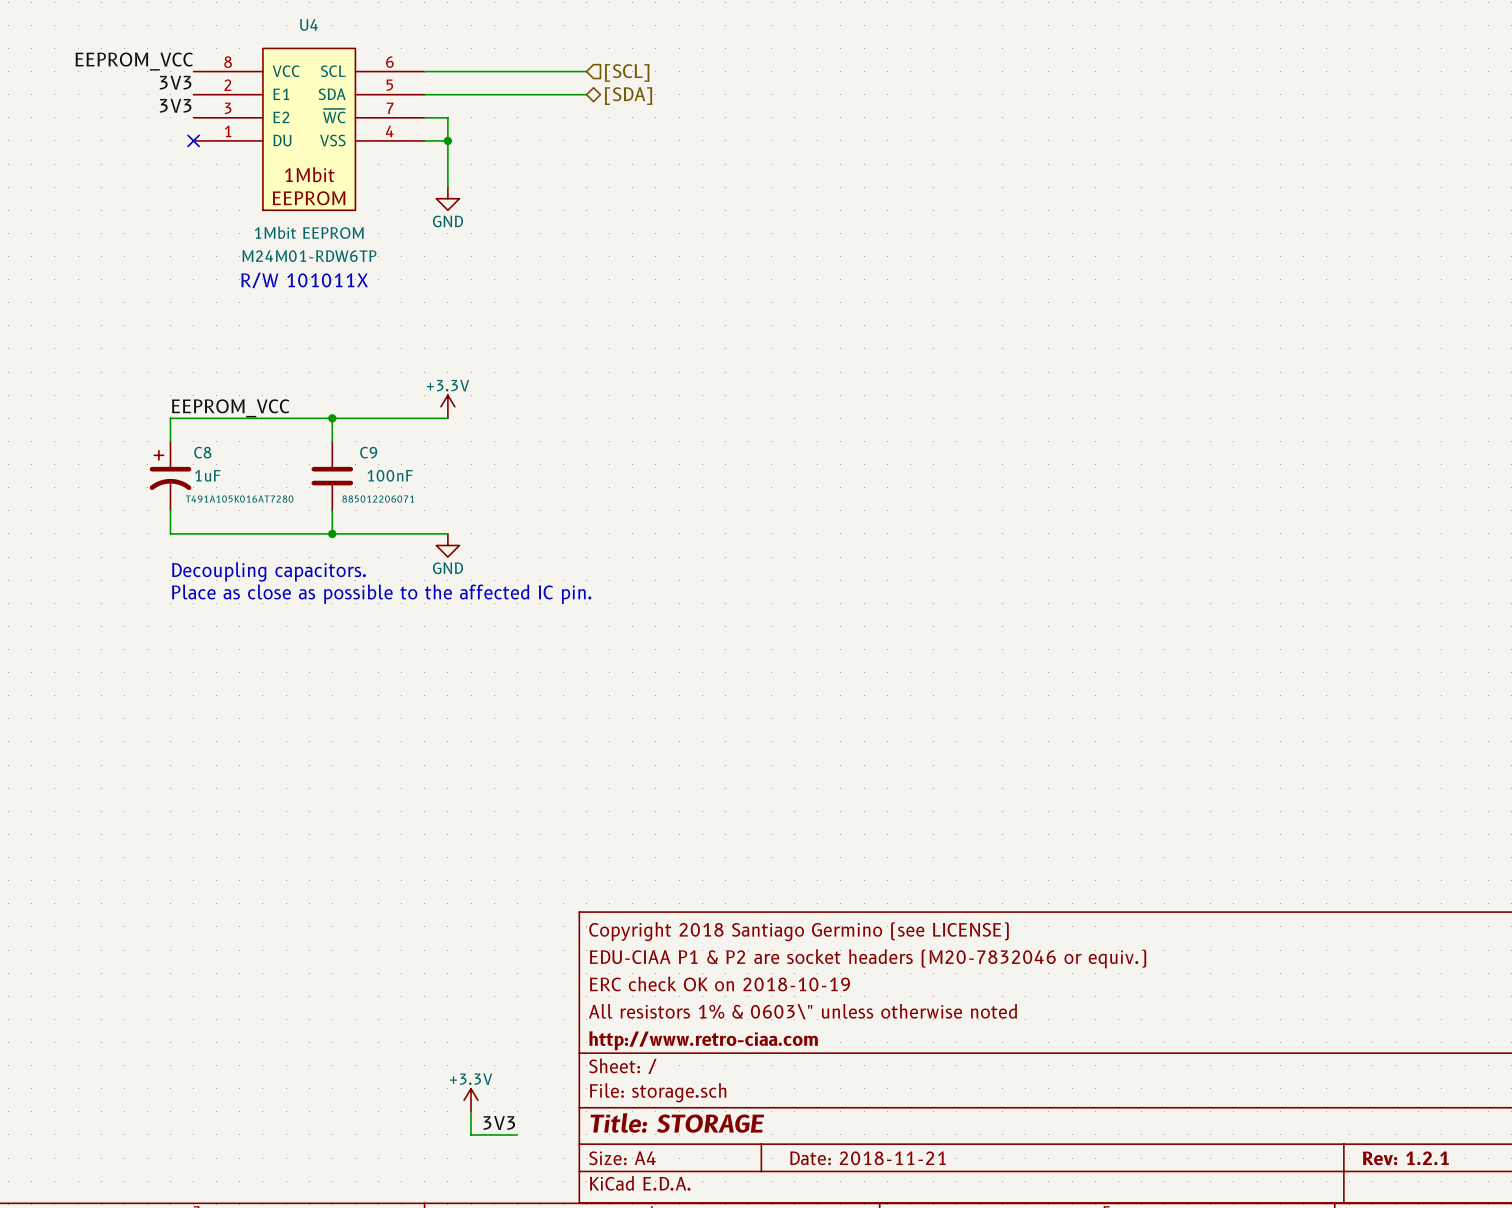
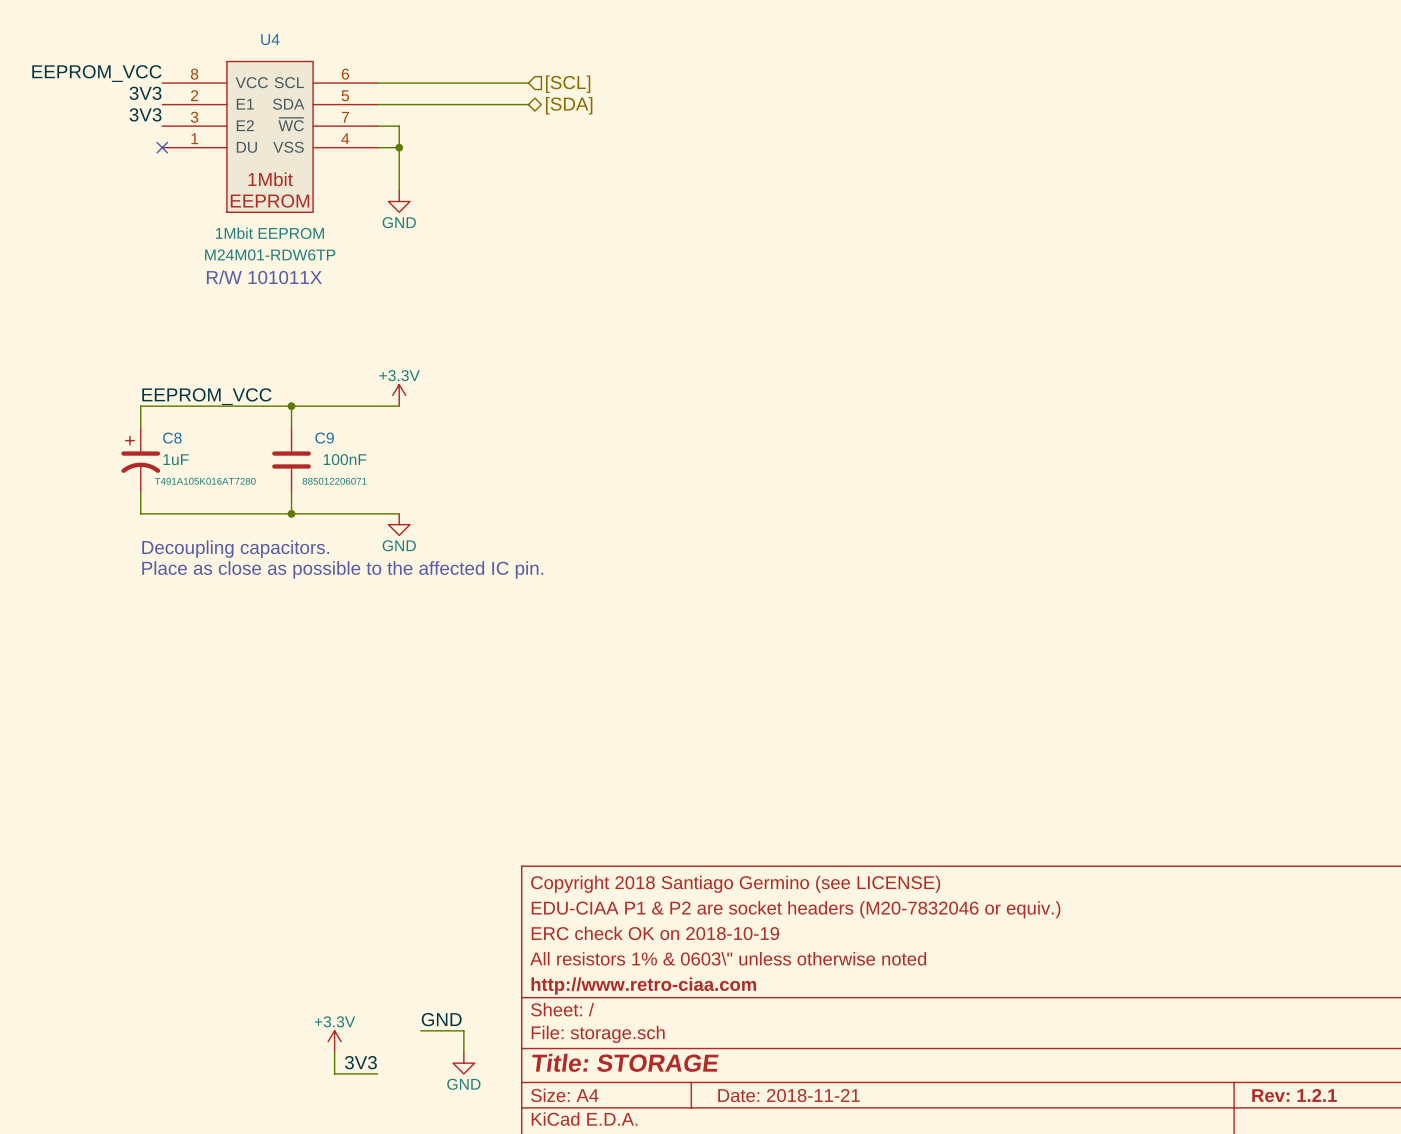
label: none -> GND (441, 1019)
wire: none -> (420, 1030) (463, 1030) (463, 1052)
power symbol position: +3.3V (471, 1100) -> +3.3V (334, 1041)
wire: (471, 1111) (471, 1134) (517, 1134) -> (334, 1052) (334, 1073) (377, 1073)
label position: 3V3 (499, 1122) -> 3V3 (360, 1062)
power symbol: none -> GND (463, 1063)

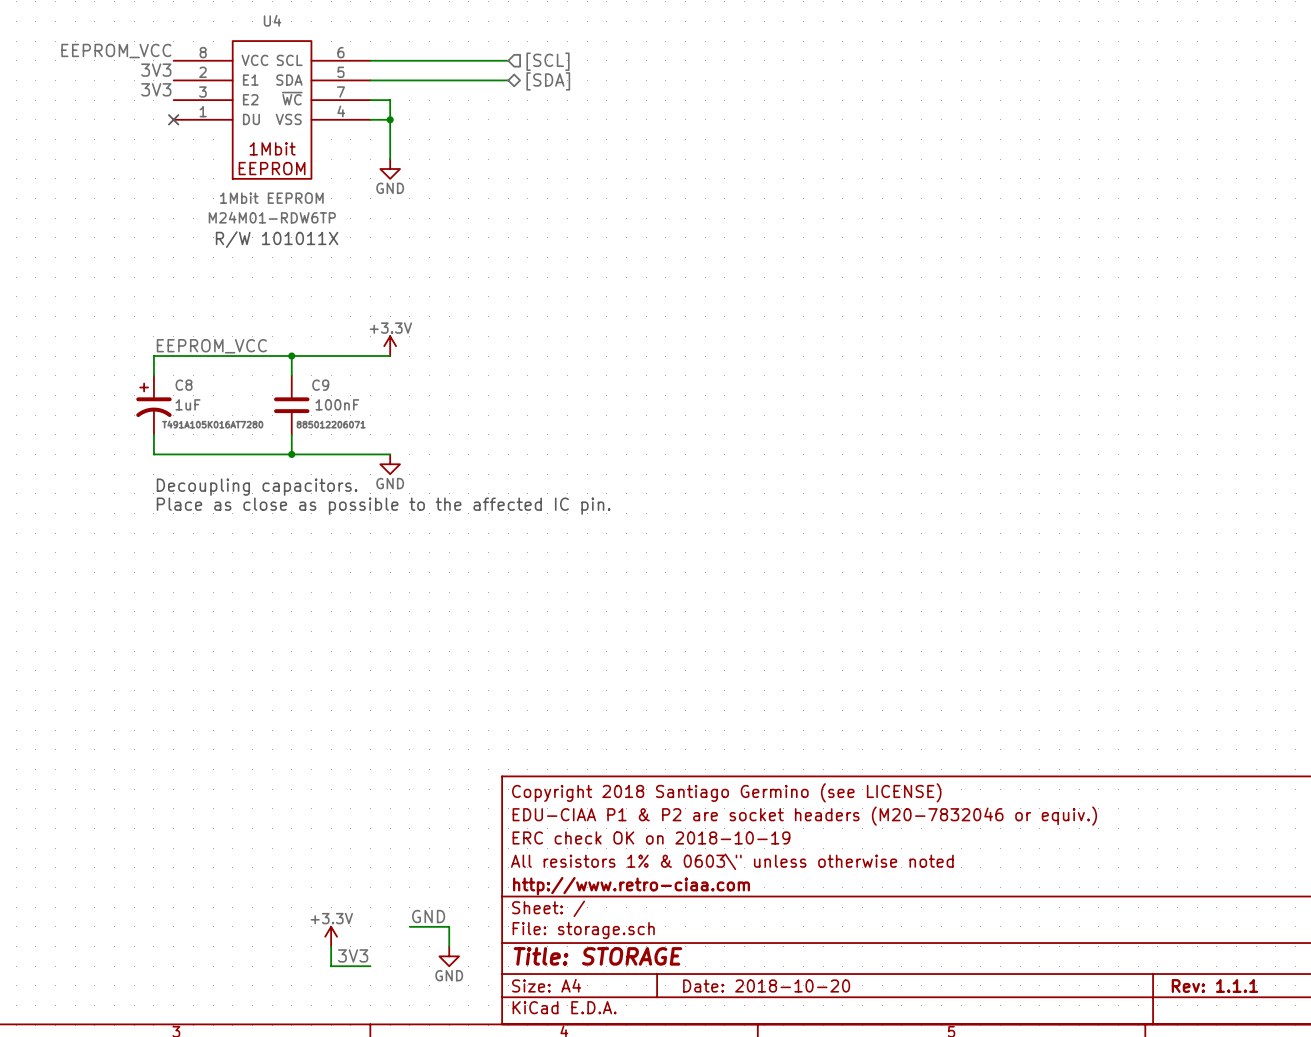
title block: Date: 2018-11-21 (789, 1095) -> Date: 2018-10-20 (766, 985)
title block: Rev: 1.2.1 (1294, 1095) -> Rev: 1.1.1 (1214, 985)

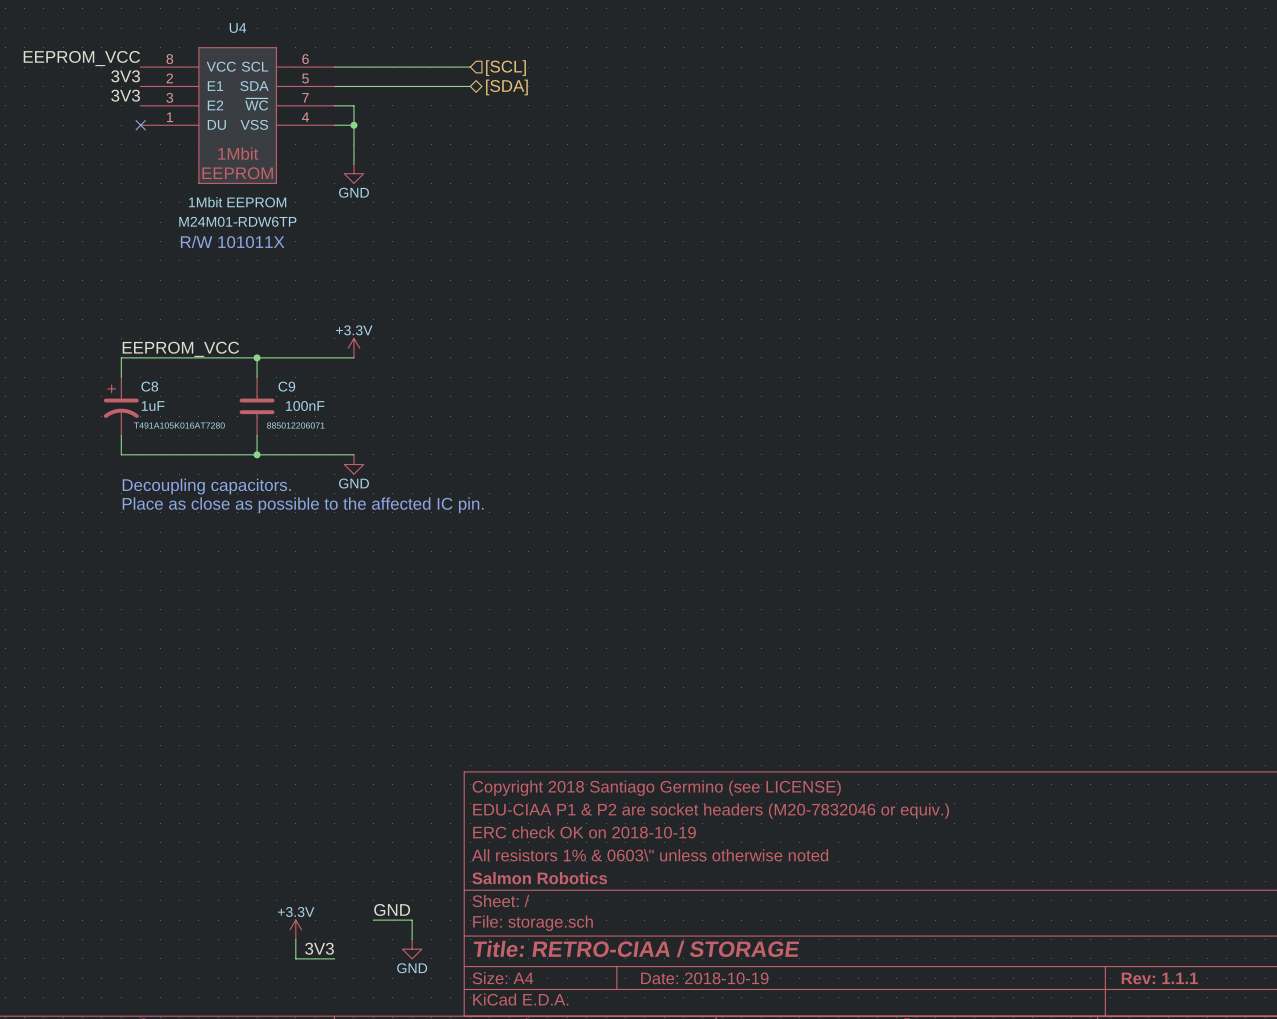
title block: http://www.retro-ciaa.com (631, 886) -> Salmon Robotics (539, 878)
title block: Title: STORAGE (597, 956) -> Title: RETRO-CIAA / STORAGE (636, 949)
title block: Date: 2018-10-20 (766, 985) -> Date: 2018-10-19 (704, 978)

